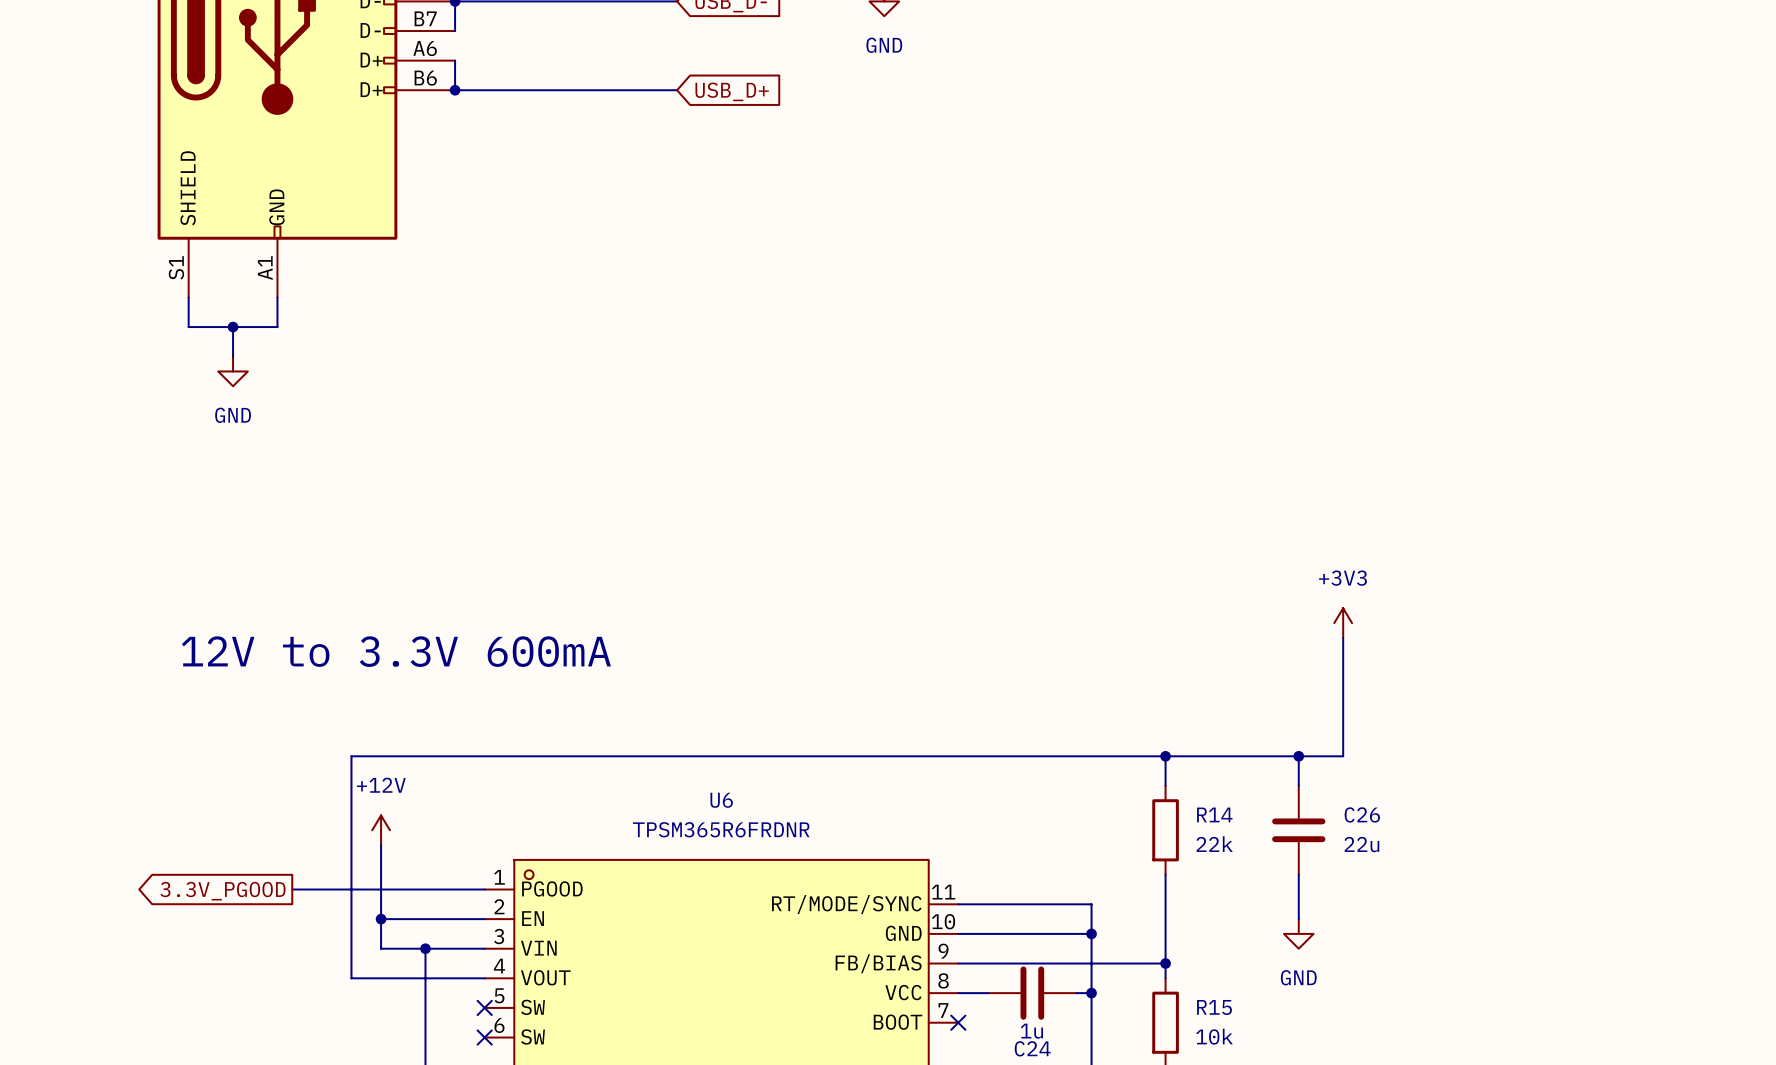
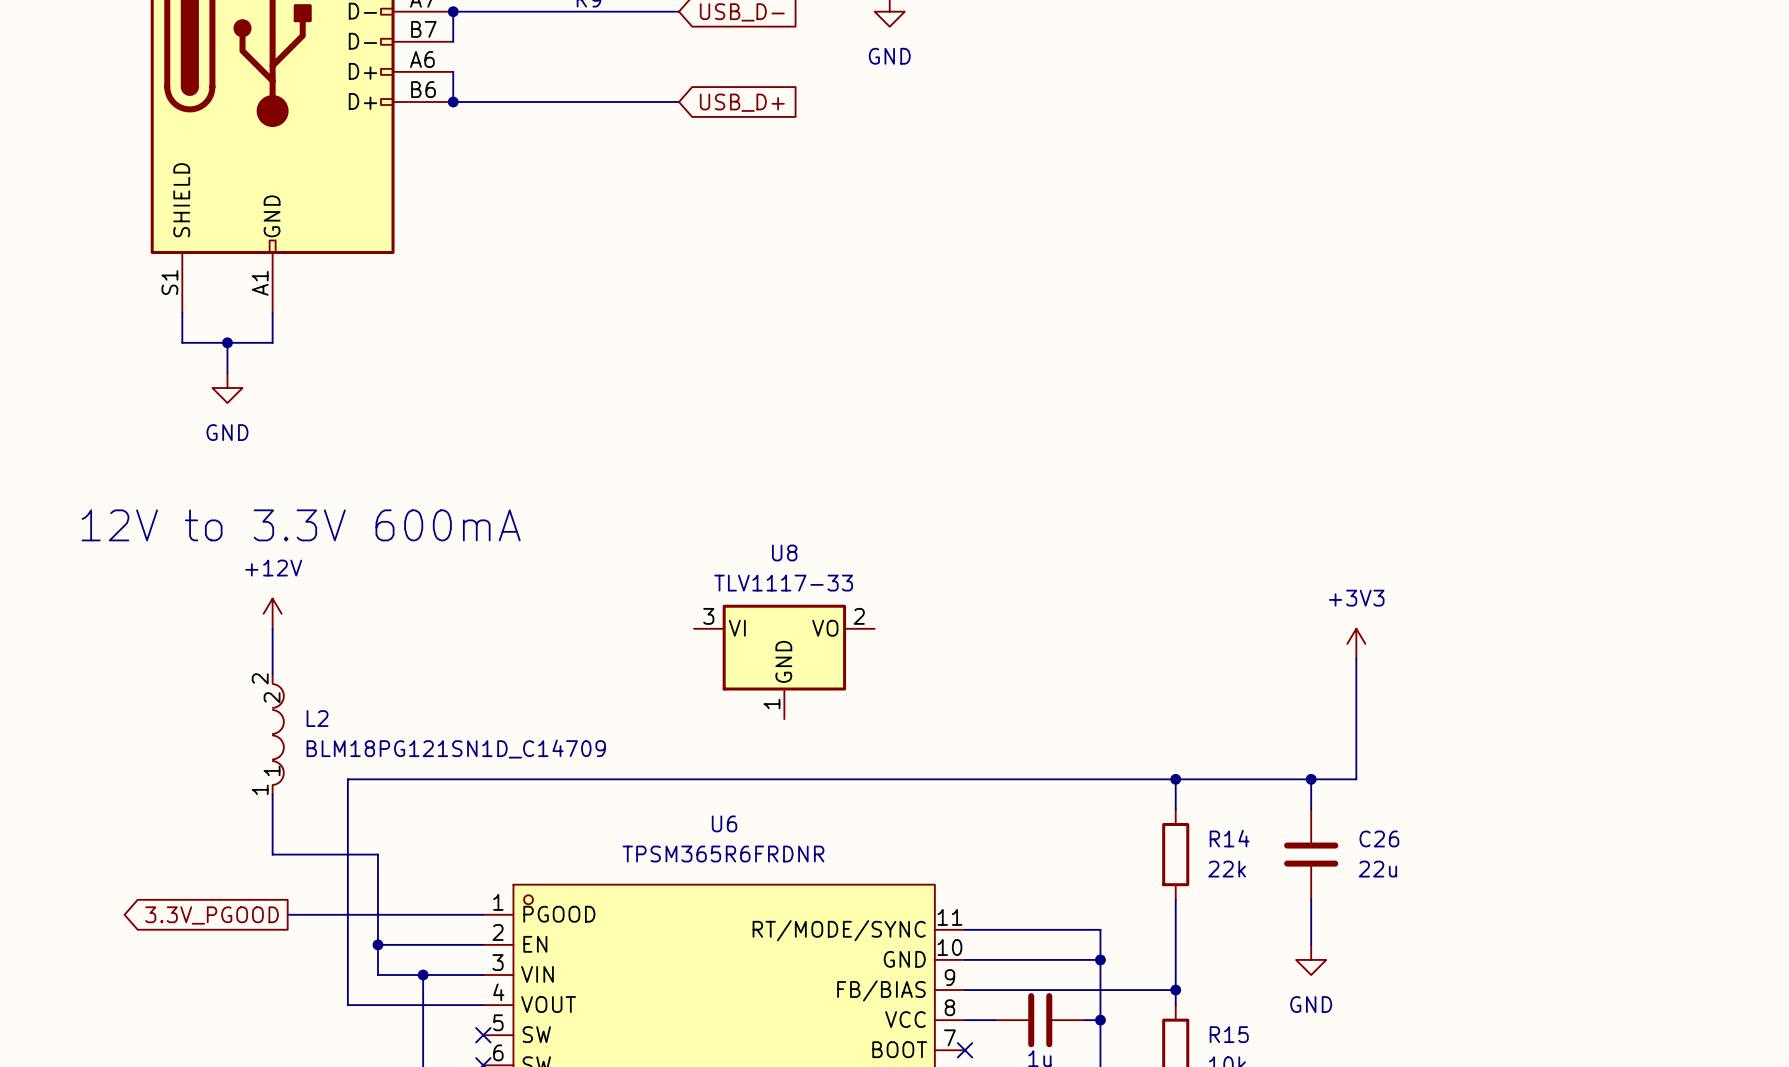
wire: none -> (272, 628) (272, 673)
U8: none -> TLV1117-33 (784, 661)
text position: 12V to 3.3V 600mA (396, 651) -> 12V to 3.3V 600mA (301, 525)
L2: none -> BLM18PG121SN1D_C14709 (278, 734)
wire: none -> (272, 794) (272, 854) (377, 854) (377, 869)
power symbol position: +12V (381, 830) -> +12V (272, 613)

